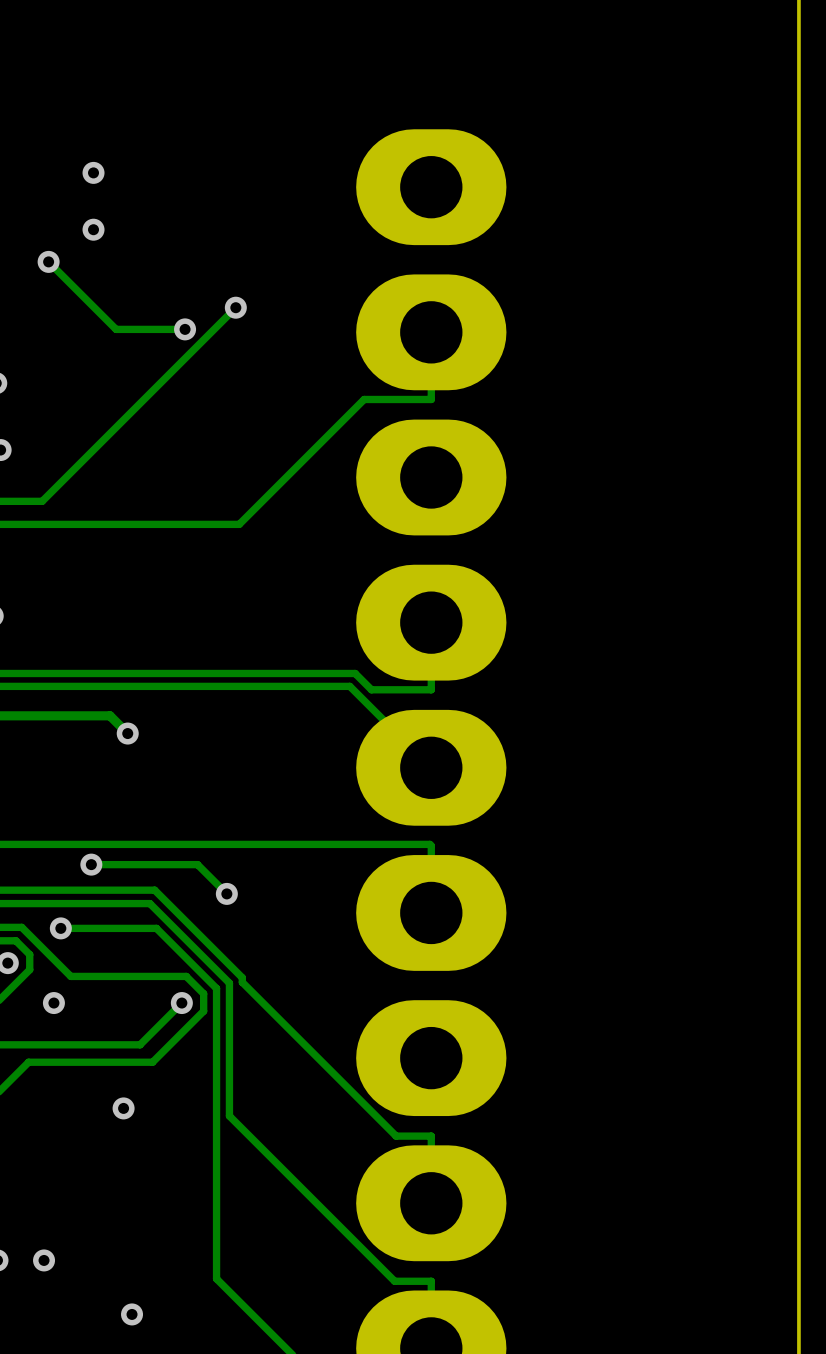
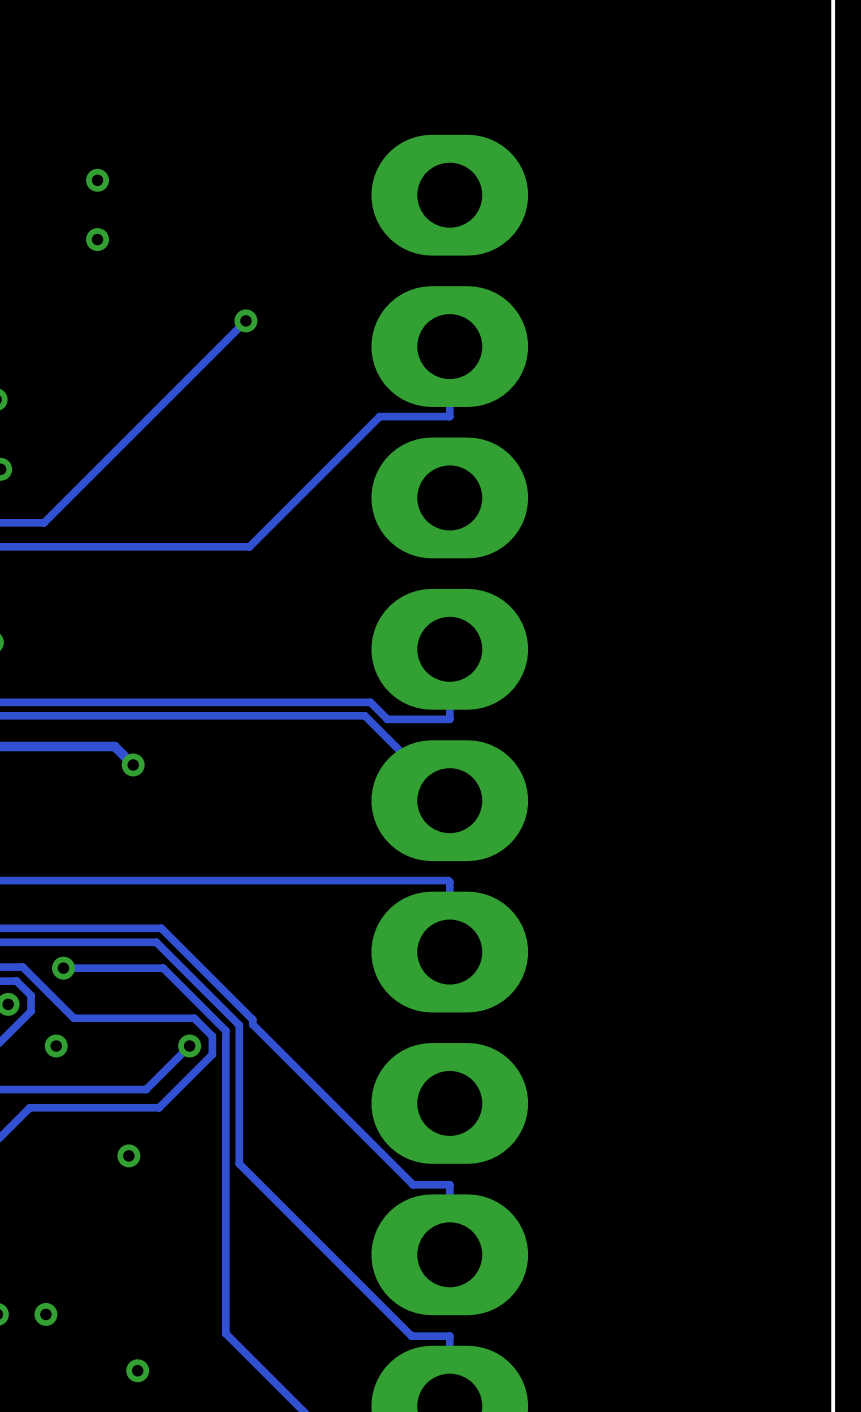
track: (48, 261) (116, 329) (185, 329) -> none
via: (48, 261) -> none
via: (185, 329) -> none
track: (91, 864) (197, 864) (226, 893) -> none
via: (91, 864) -> none
via: (226, 893) -> none

